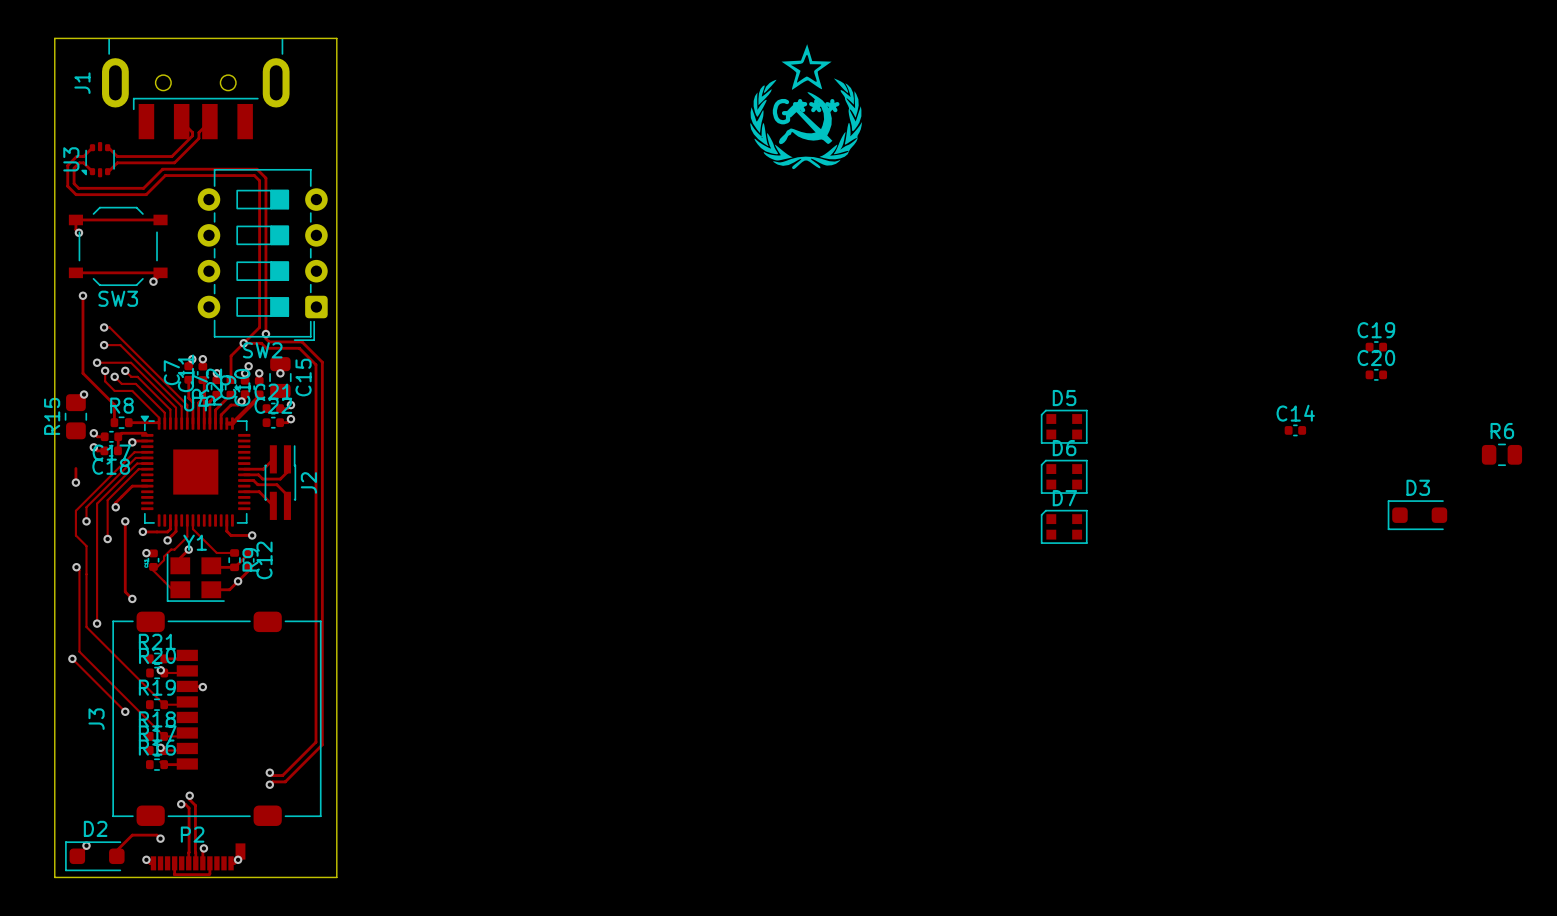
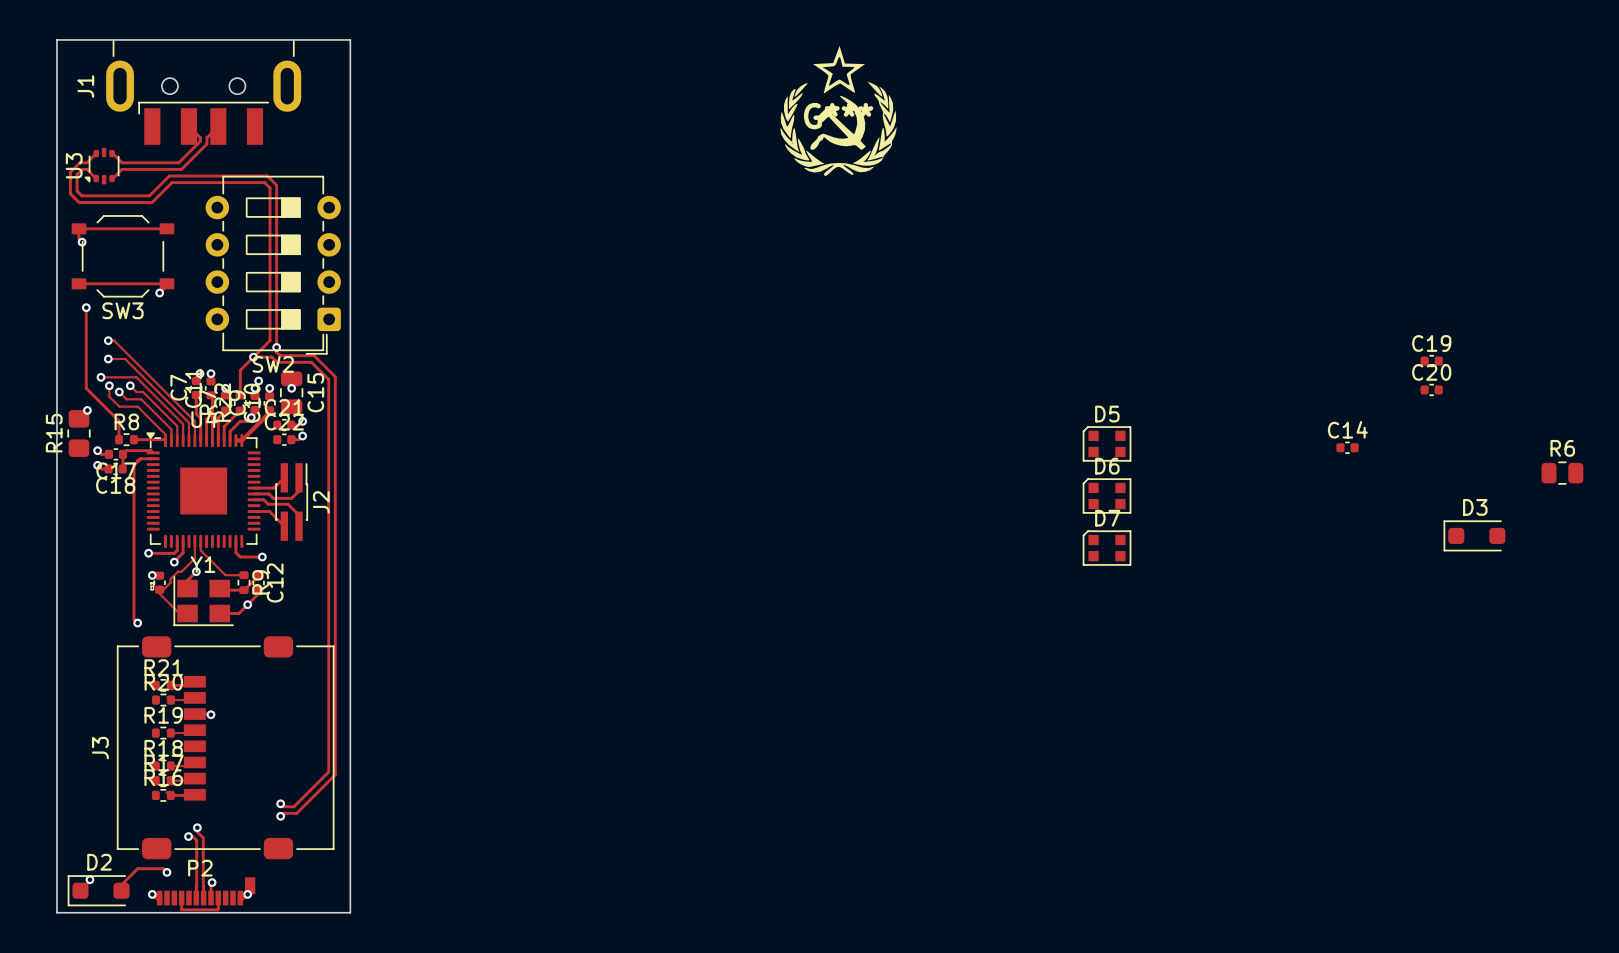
via: (132, 442) -> none
track: (147, 452) (134, 452) (75, 510) (75, 535) (86, 546) (86, 627) (164, 704) -> none
track: (147, 457) (135, 457) (86, 507) (86, 521) -> none
track: (147, 463) (137, 463) (97, 503) (97, 623) -> none
track: (75, 468) (75, 482) -> none
track: (147, 469) (138, 469) (107, 500) (107, 539) -> none
via: (75, 482) -> none
track: (147, 486) (132, 486) (115, 502) (115, 507) -> none
via: (115, 507) -> none
via: (86, 521) -> none
track: (125, 521) (125, 591) (128, 595) -> (140, 458) (133, 465) (133, 619)
via: (125, 521) -> none
via: (107, 539) -> none
track: (76, 567) (79, 570) (79, 651) (164, 736) -> none
via: (76, 567) -> none
via: (97, 623) -> none
track: (72, 658) (125, 711) -> none
via: (72, 658) -> none
via: (160, 670) -> none
via: (125, 711) -> none
via: (160, 747) -> none

